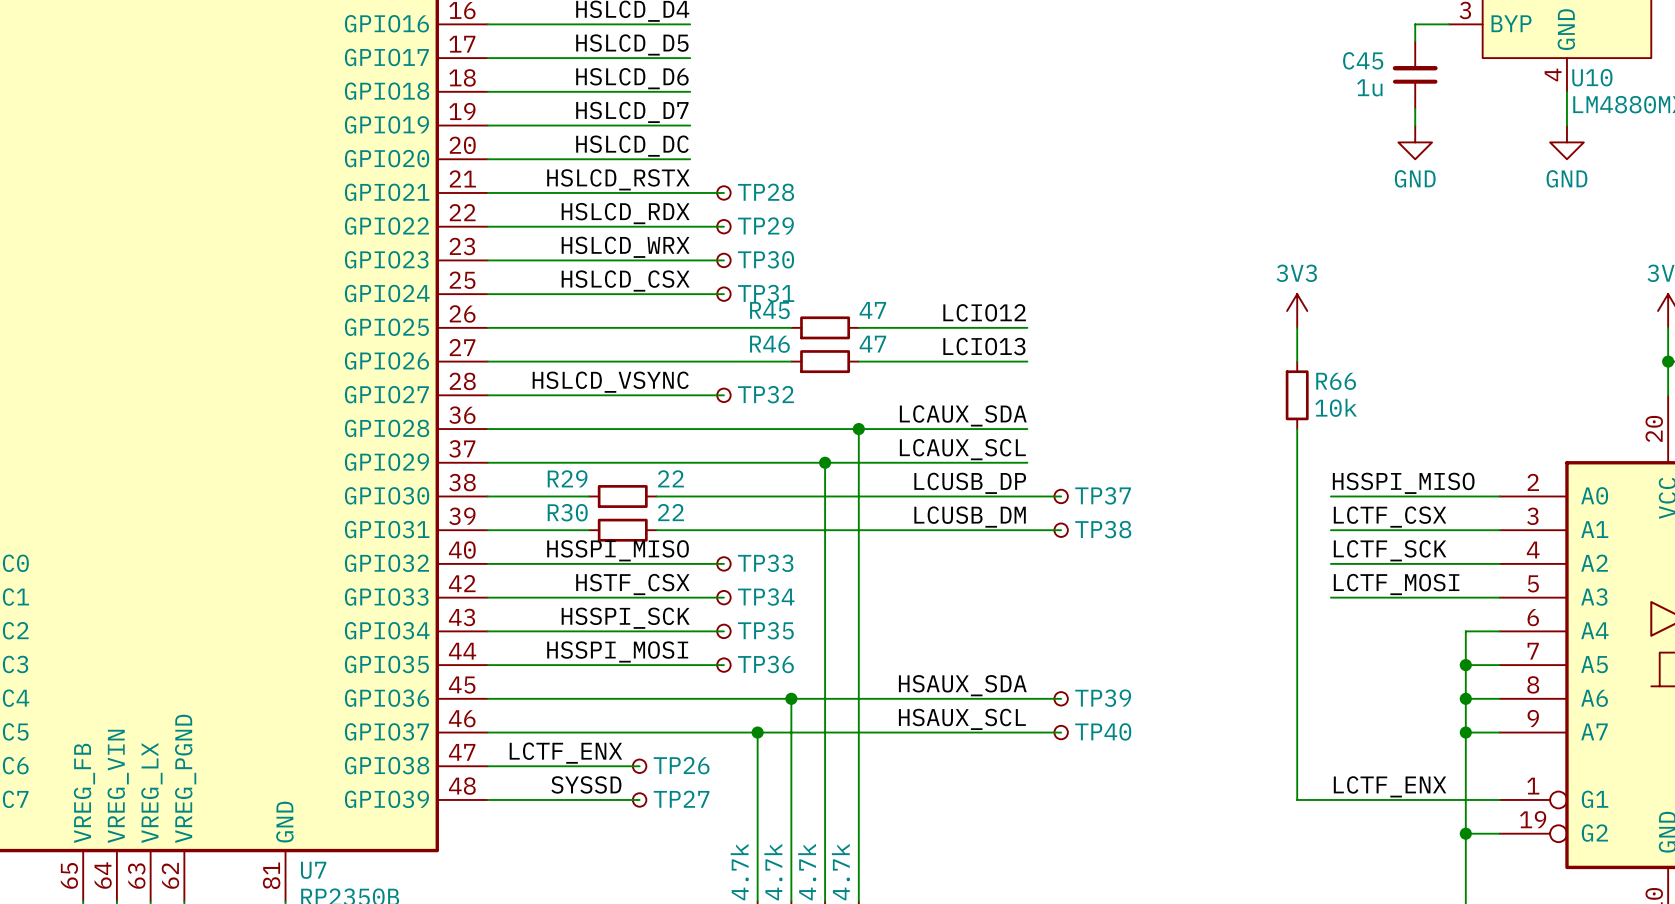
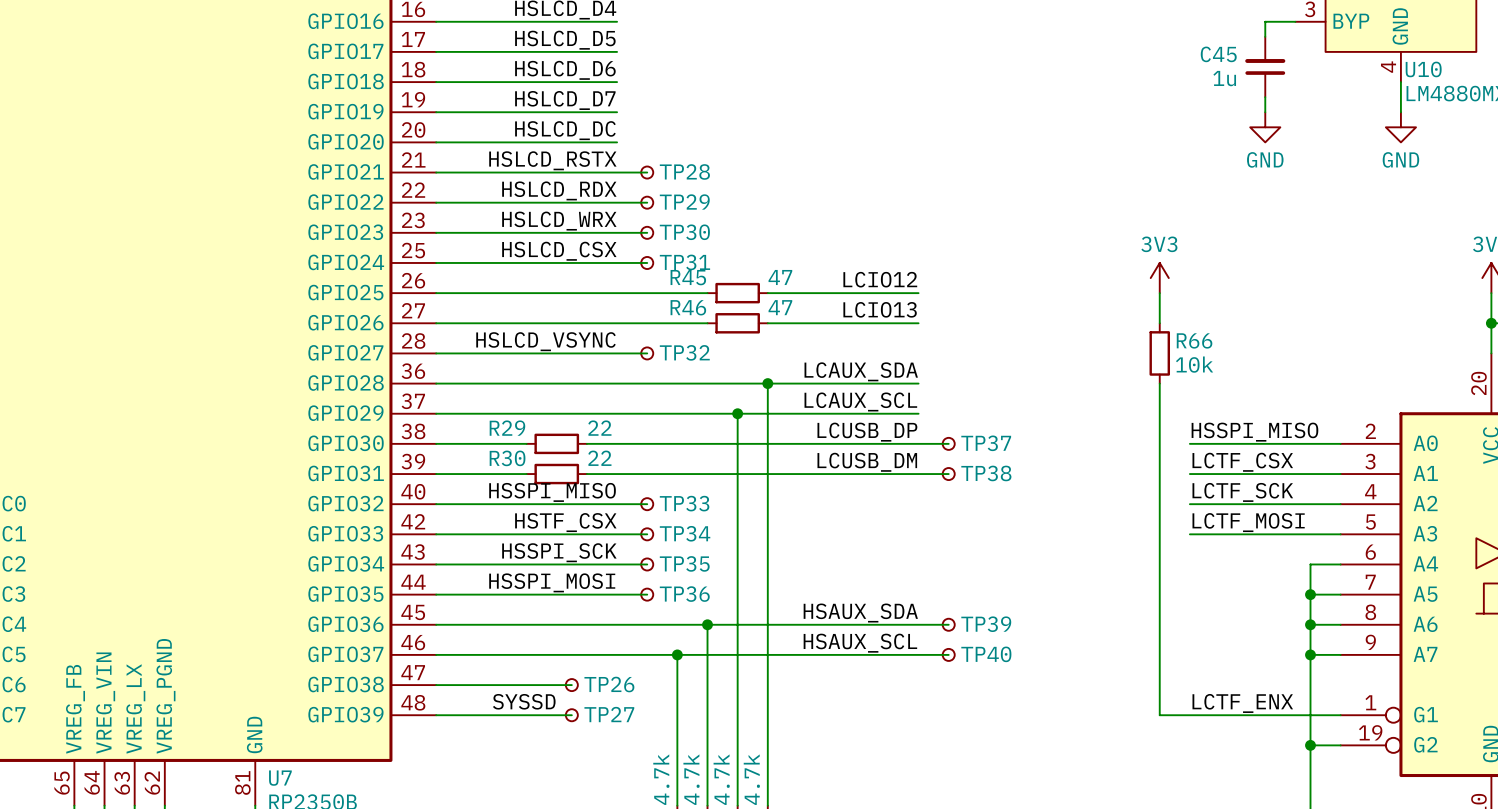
label: LCTF_ENX (565, 753) -> none

